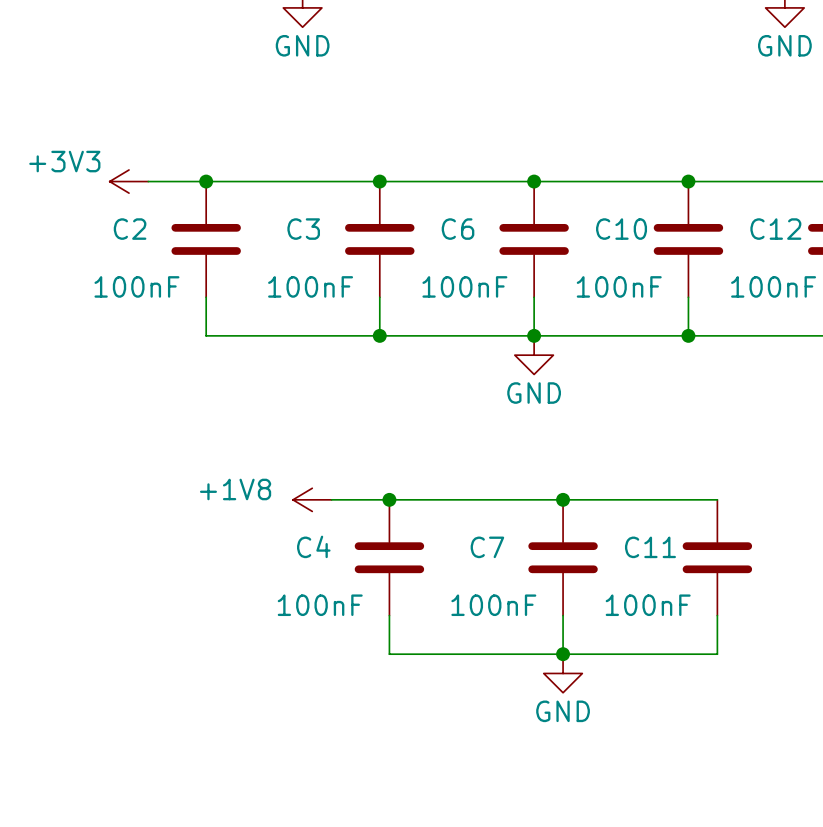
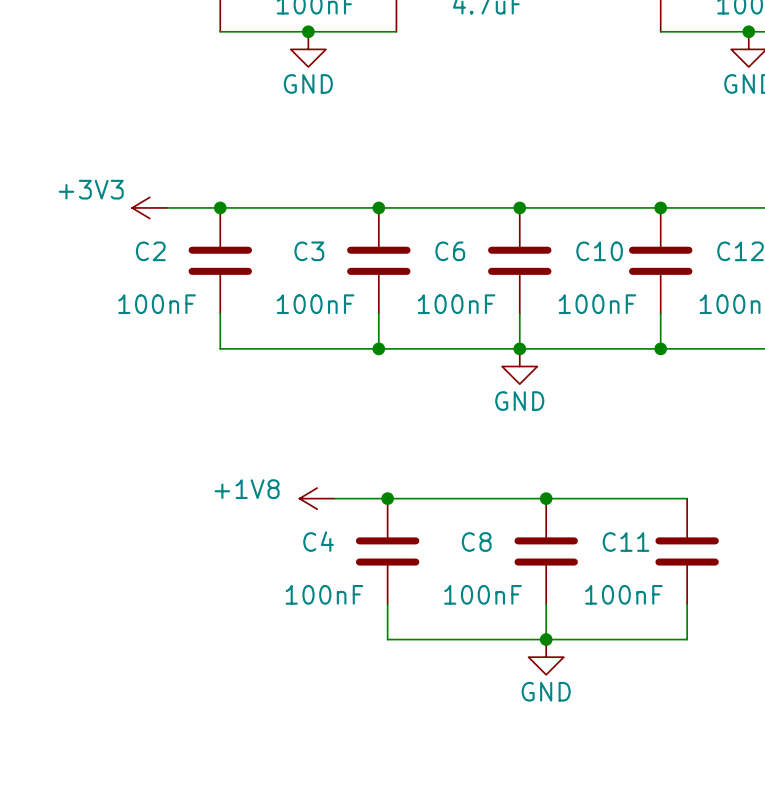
C7 name: C7 (487, 547) -> C8 (476, 542)

